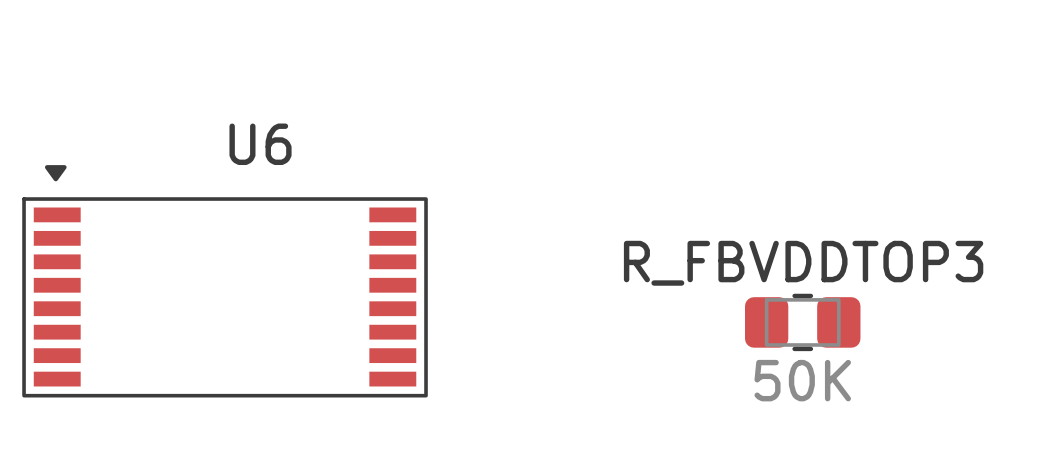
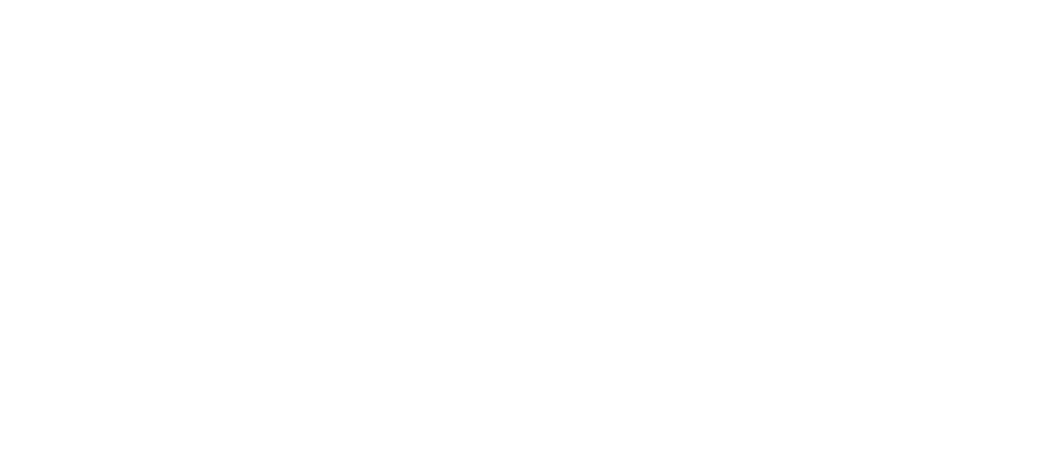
U6: (225, 281) -> none
R_FBVDDTOP3: 50K (802, 322) -> none

